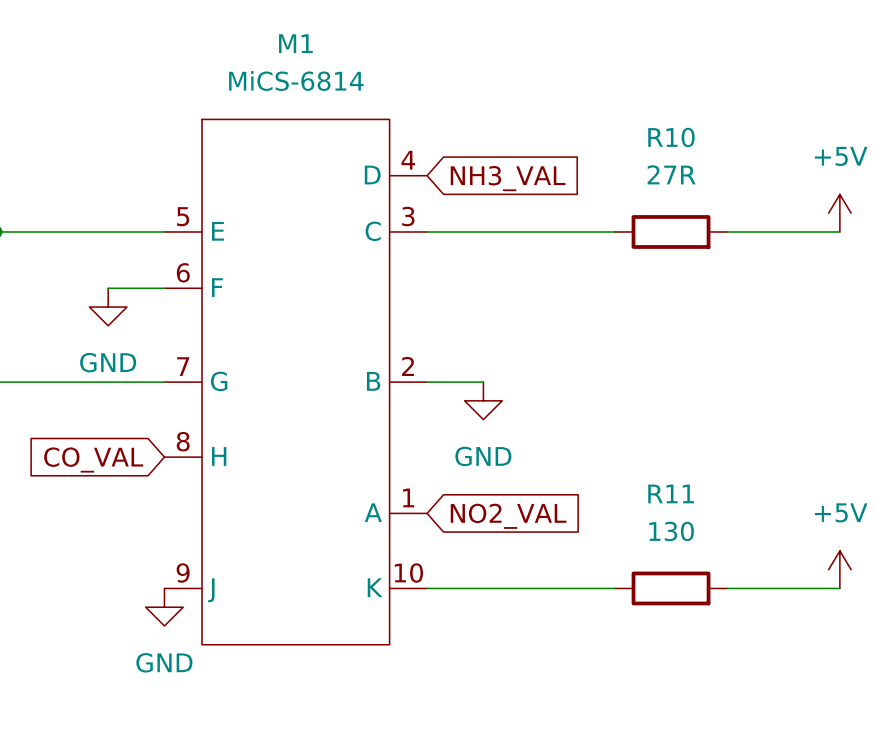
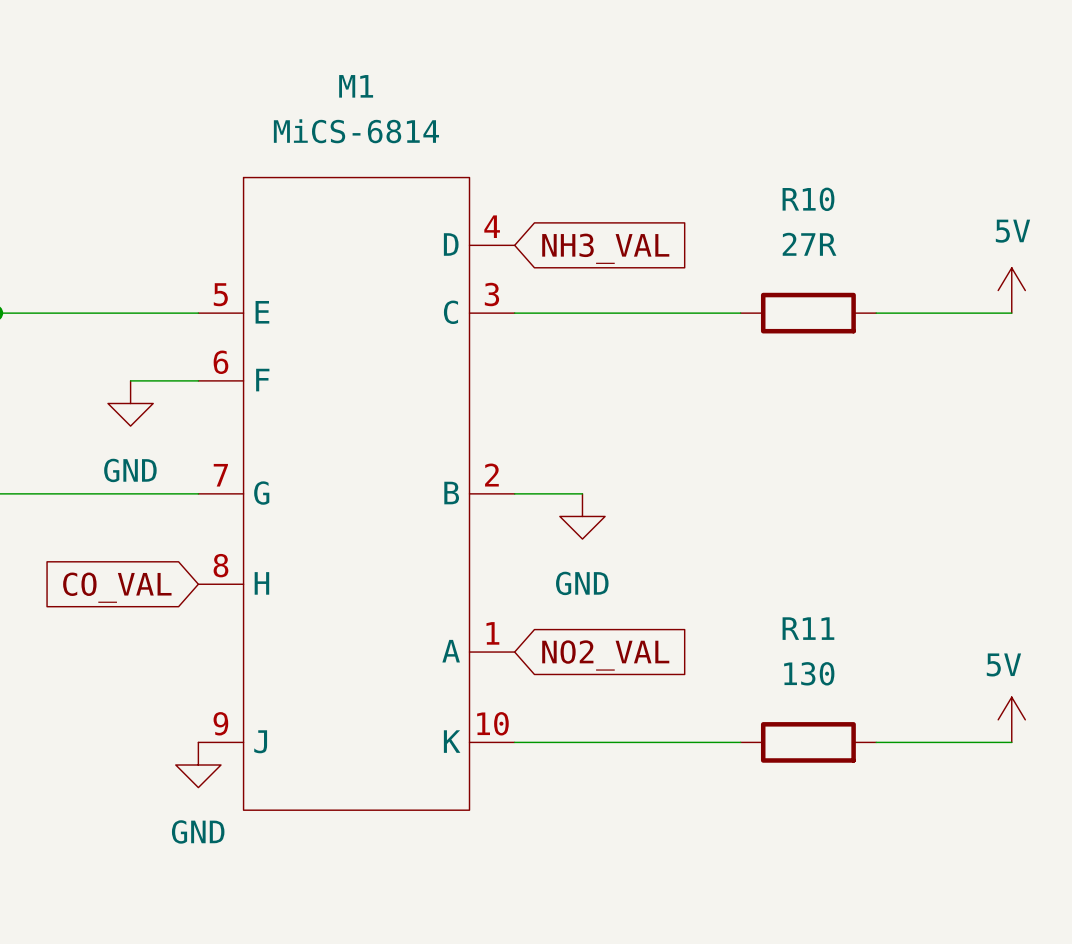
power symbol: +5V (839, 213) -> 5V (1011, 290)
power symbol: +5V (839, 569) -> 5V (1011, 719)

